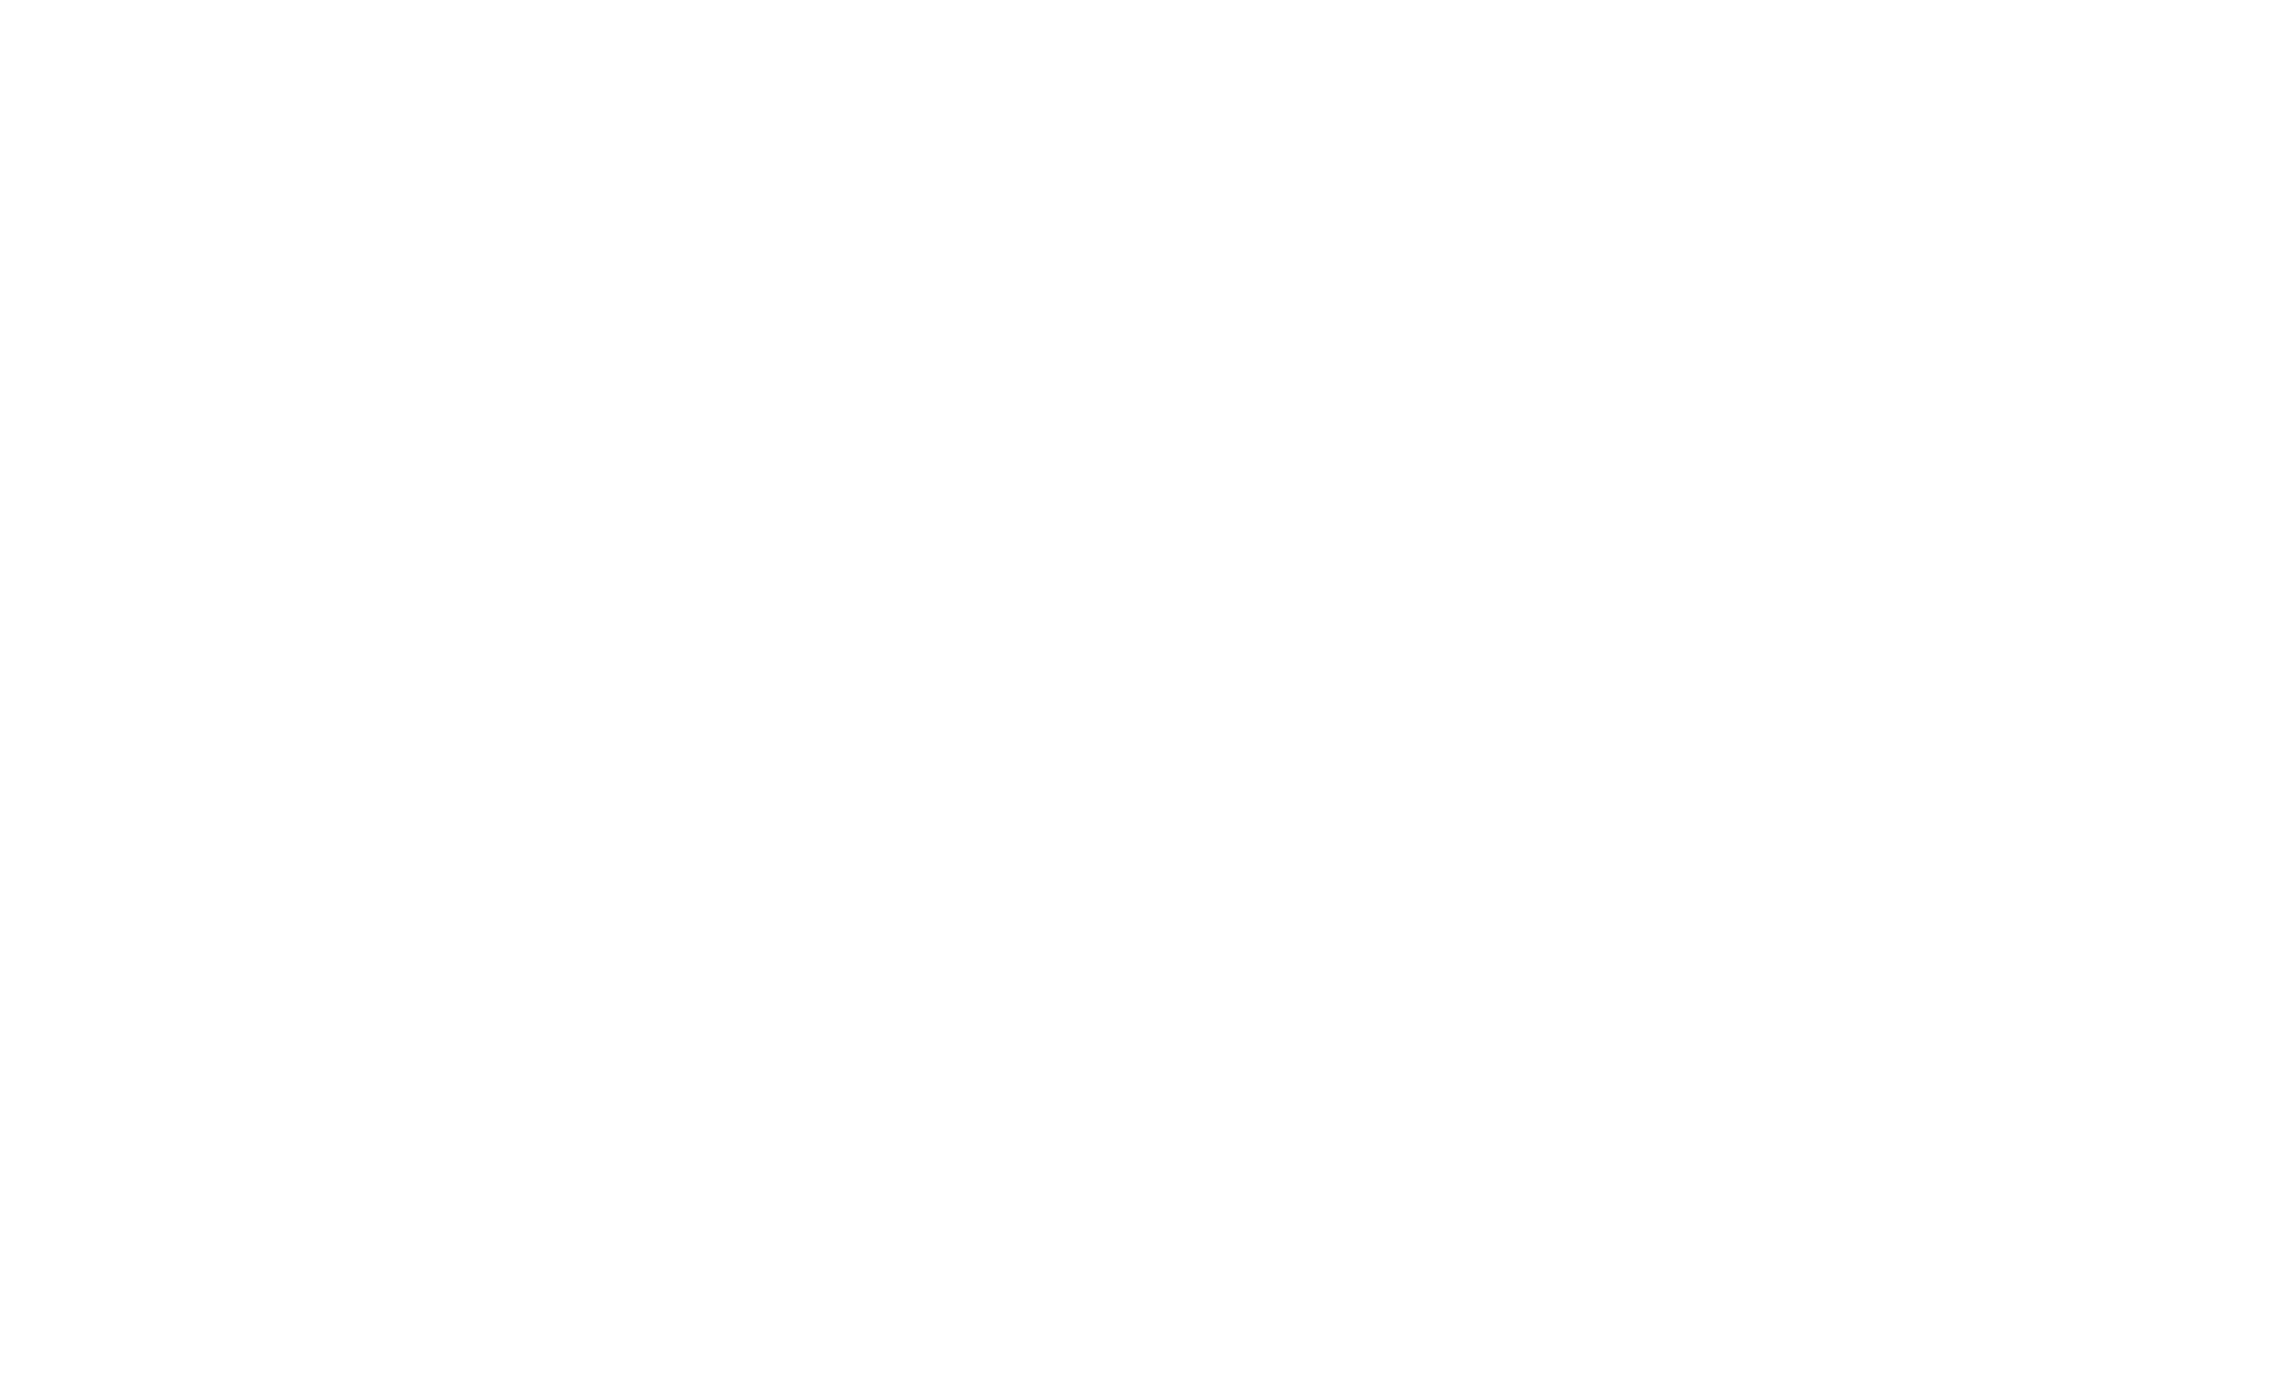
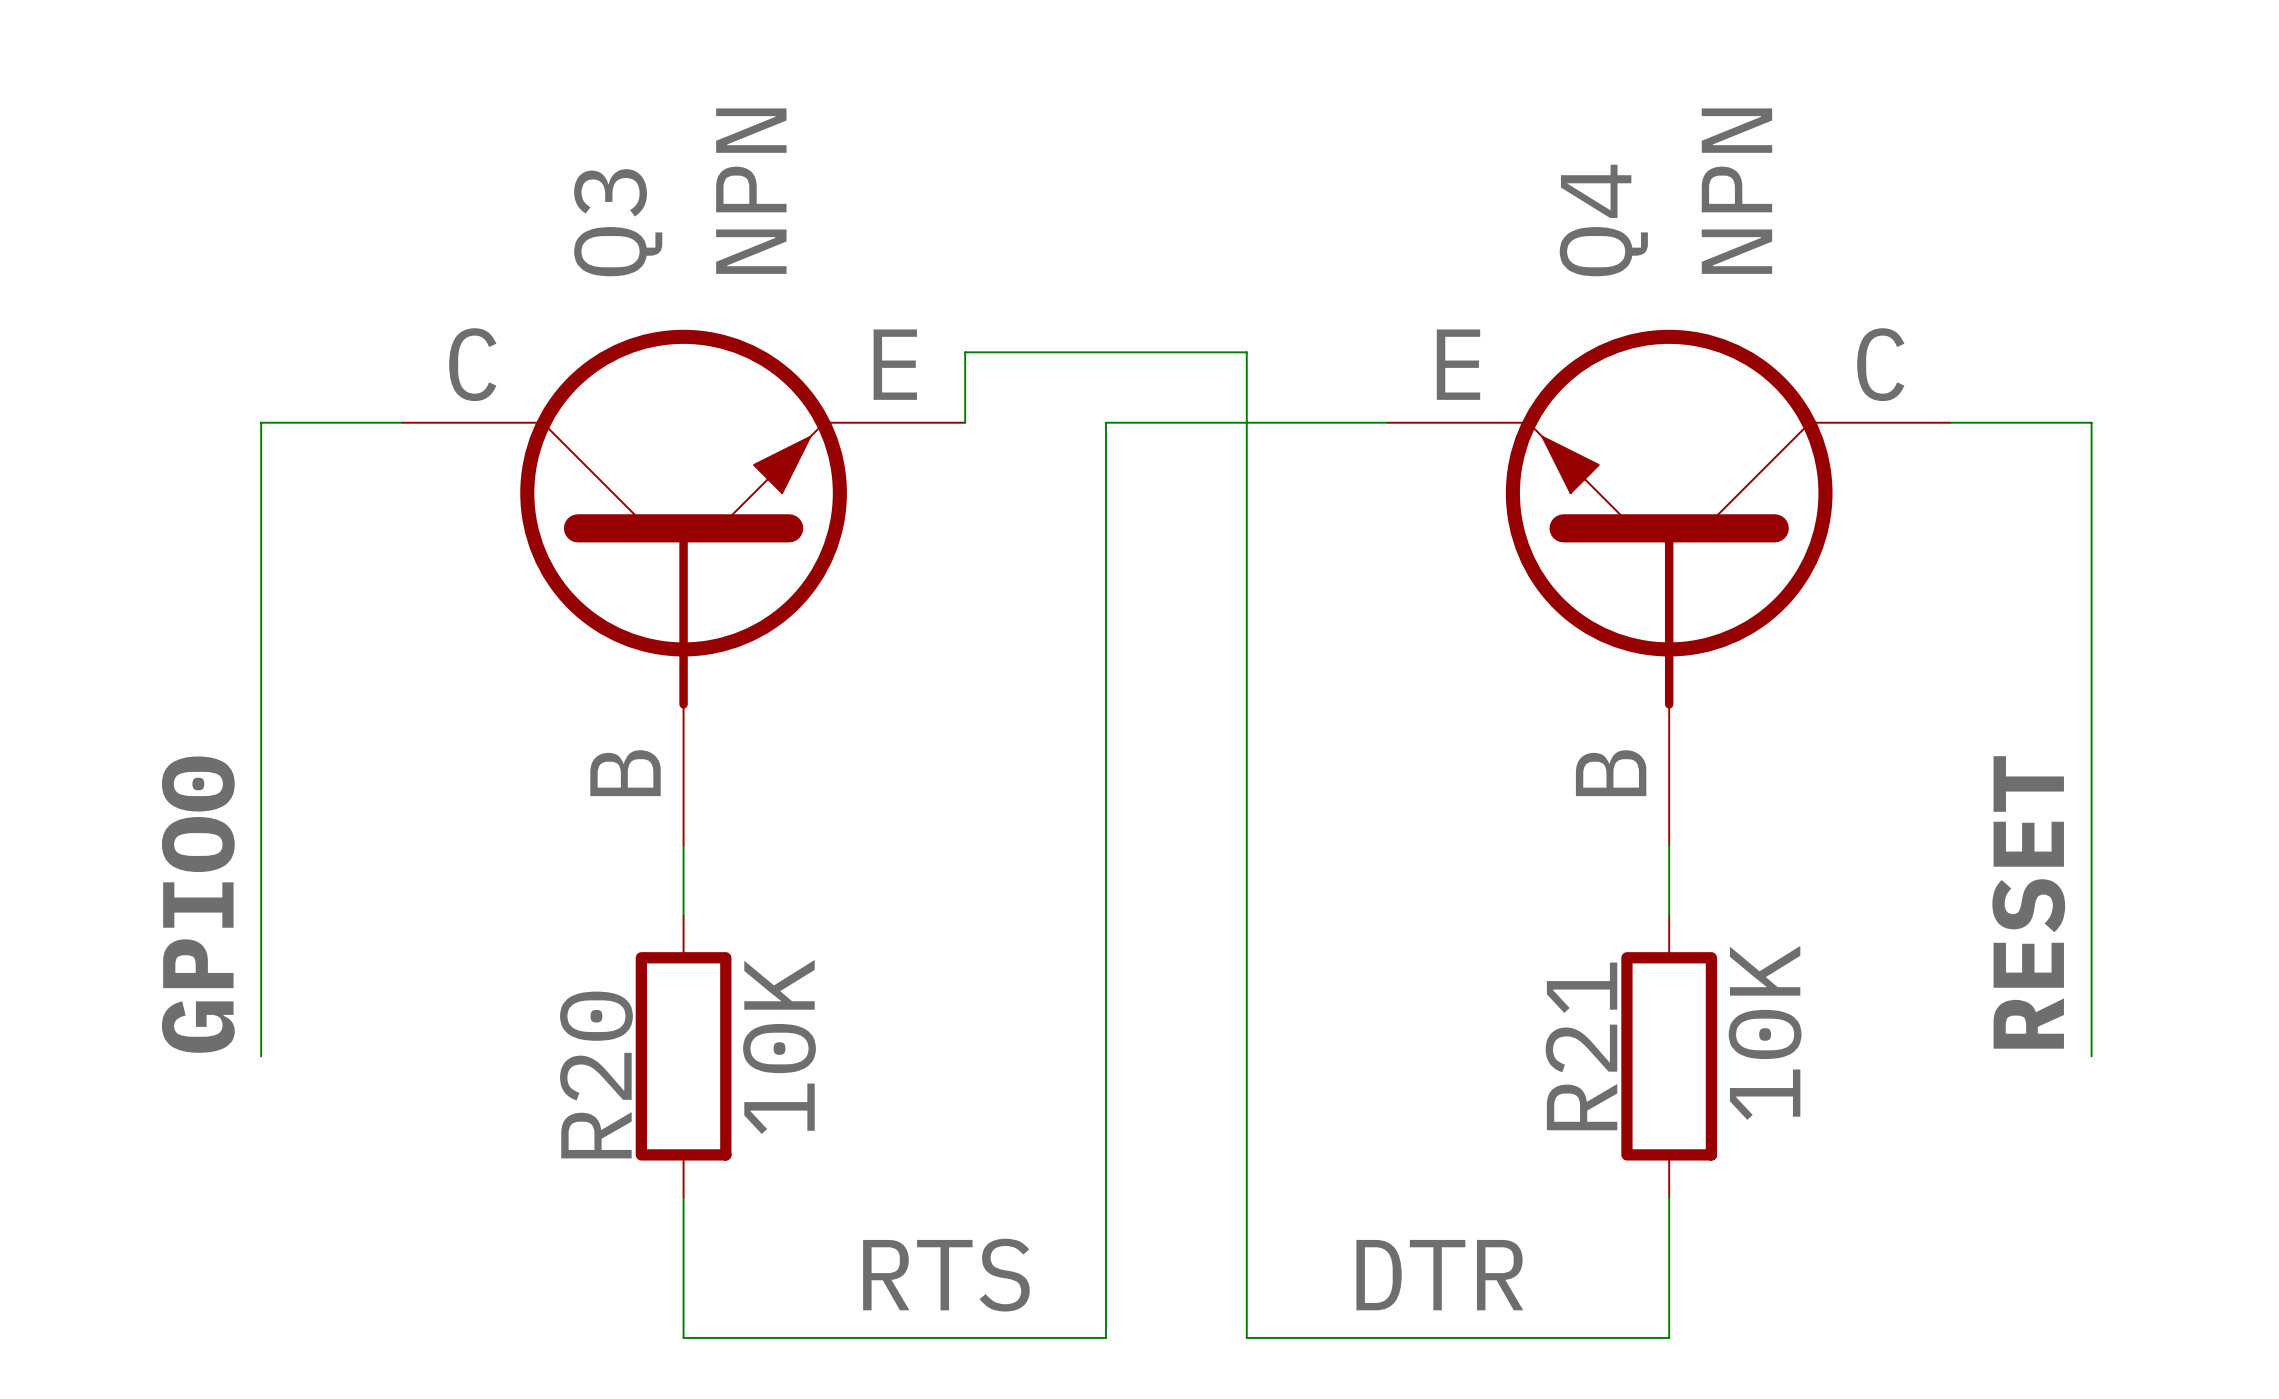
wire: none -> (401, 422) (261, 422) (261, 1056)
wire: none -> (965, 422) (965, 352) (1246, 352) (1246, 1337) (1669, 1337) (1669, 1197)
wire: none -> (1387, 422) (1105, 422) (1105, 1337) (683, 1337) (683, 1197)
wire: none -> (1950, 422) (2091, 422) (2091, 1056)
Q3: none -> NPN (683, 587)
Q4: none -> NPN (1669, 587)
wire: none -> (683, 845) (683, 915)
wire: none -> (1669, 845) (1669, 915)
label: none -> RESET (2028, 902)
label: none -> GPIO0 (198, 904)
R20: none -> 10K (683, 1056)
R21: none -> 10K (1669, 1056)
label: none -> RTS (946, 1275)
label: none -> DTR (1439, 1275)

